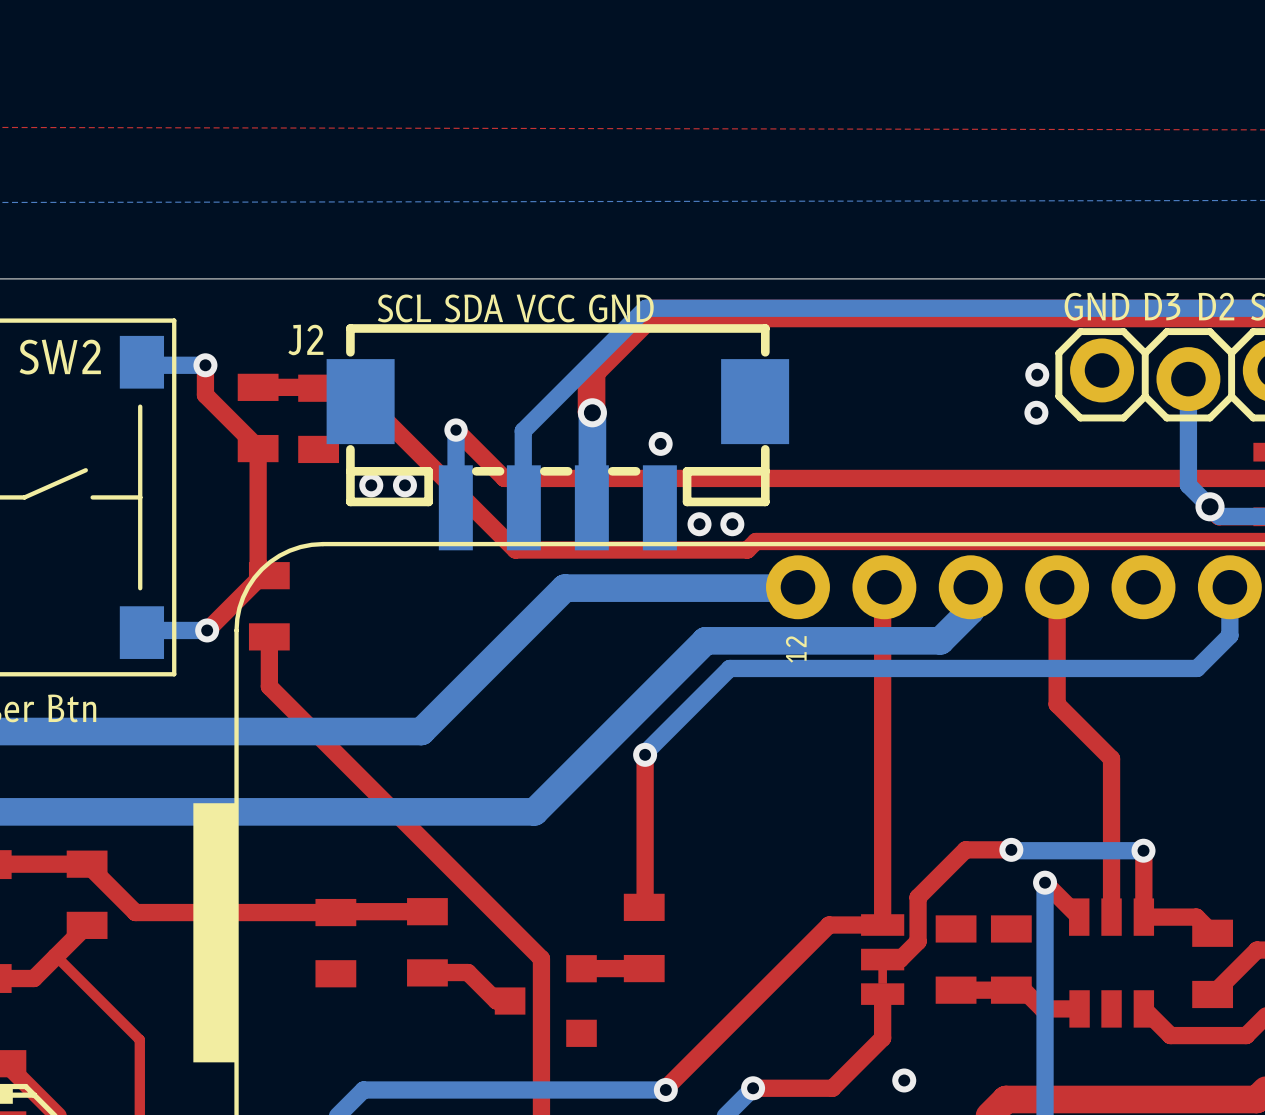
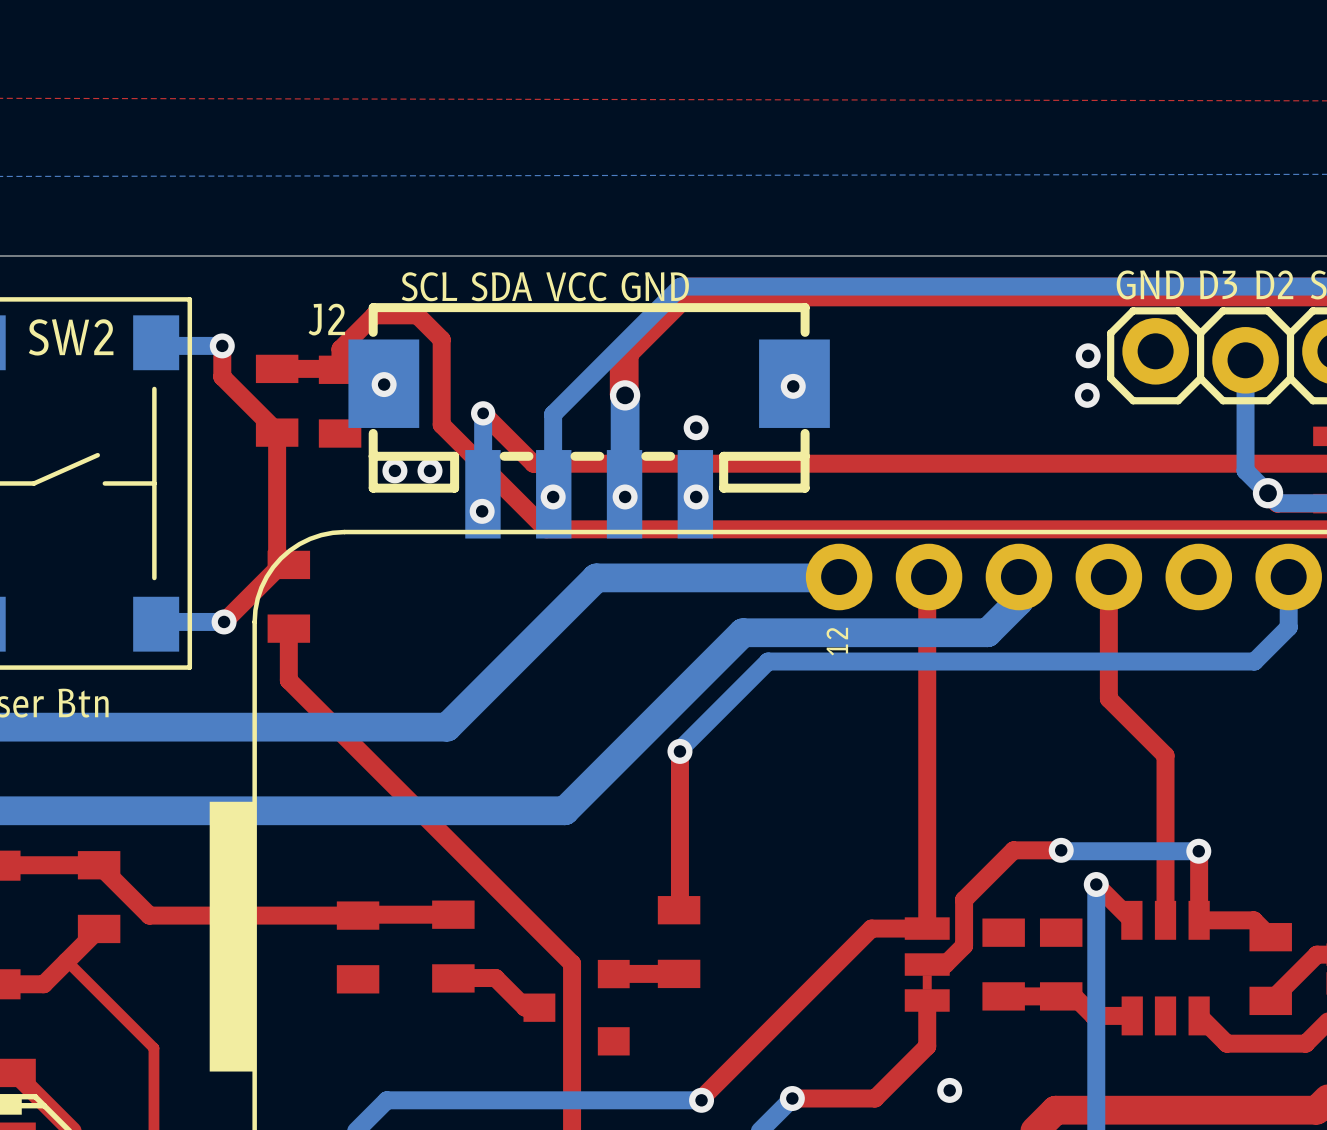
top track: (318, 388) (354, 388) (515, 550) (747, 550) (755, 541) -> (340, 370) (340, 349) (374, 315) (417, 315) (441, 339) (441, 424) (546, 529) (795, 529)
via: none -> (384, 384)
via: none -> (793, 386)
via: none -> (553, 496)
via: none -> (625, 496)
via: none -> (696, 496)
via: none -> (482, 511)
via: (699, 524) -> none
via: (732, 524) -> none

